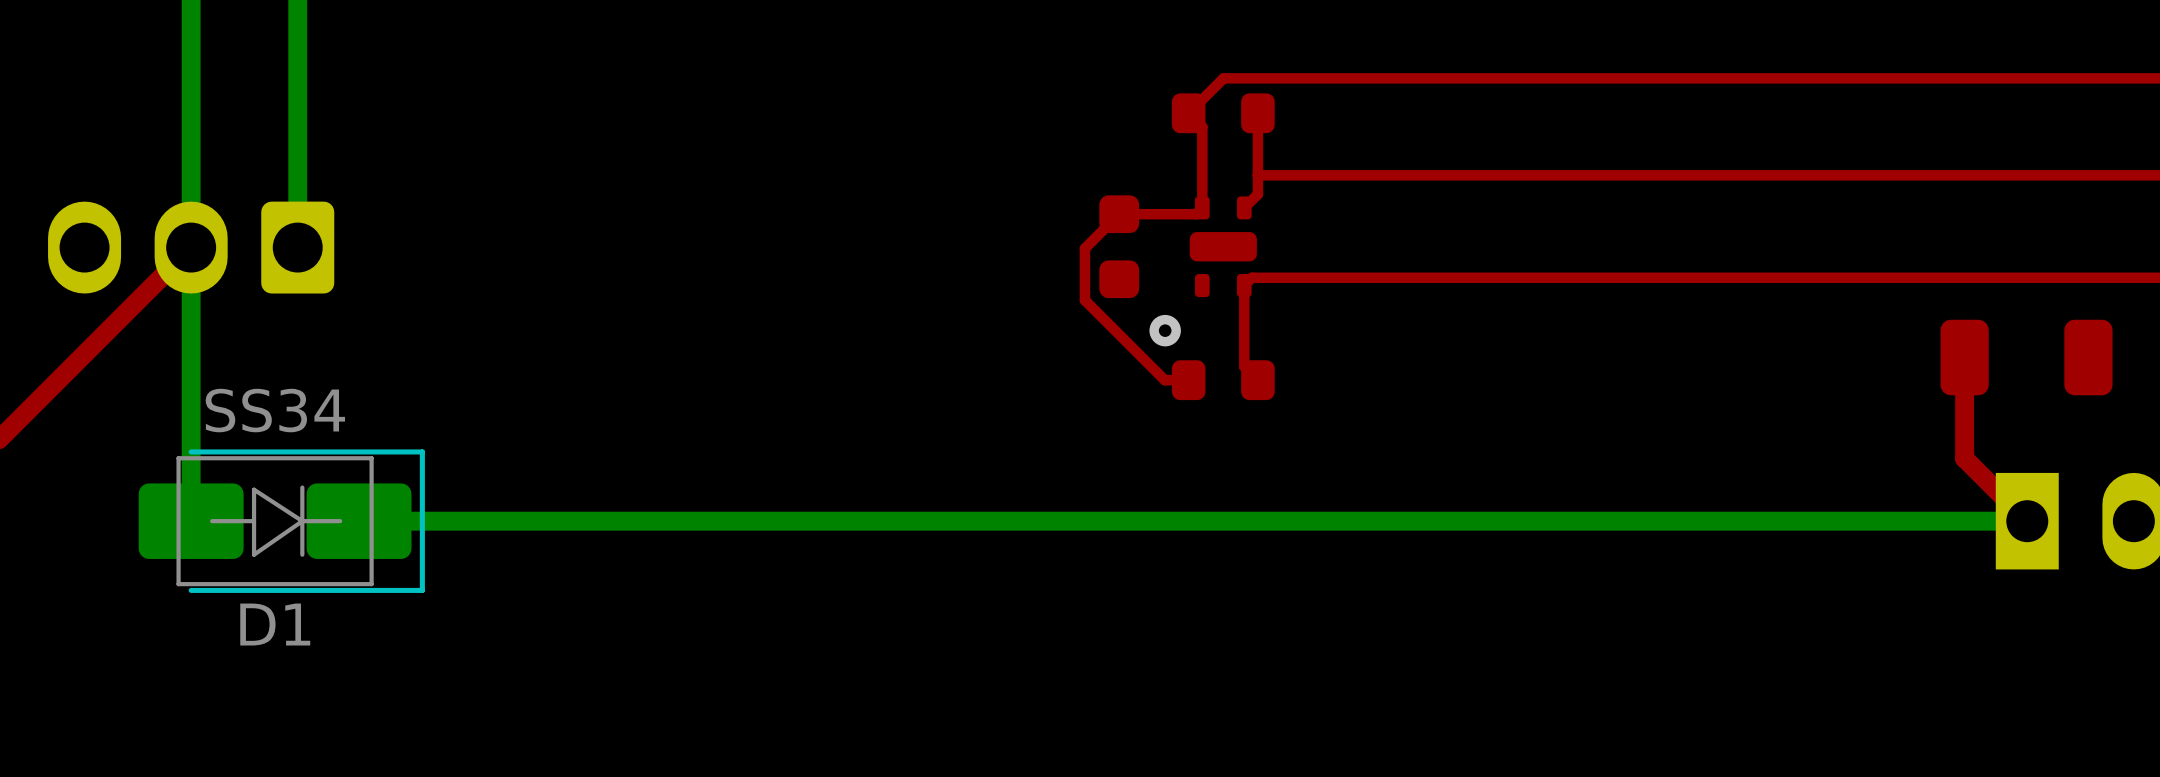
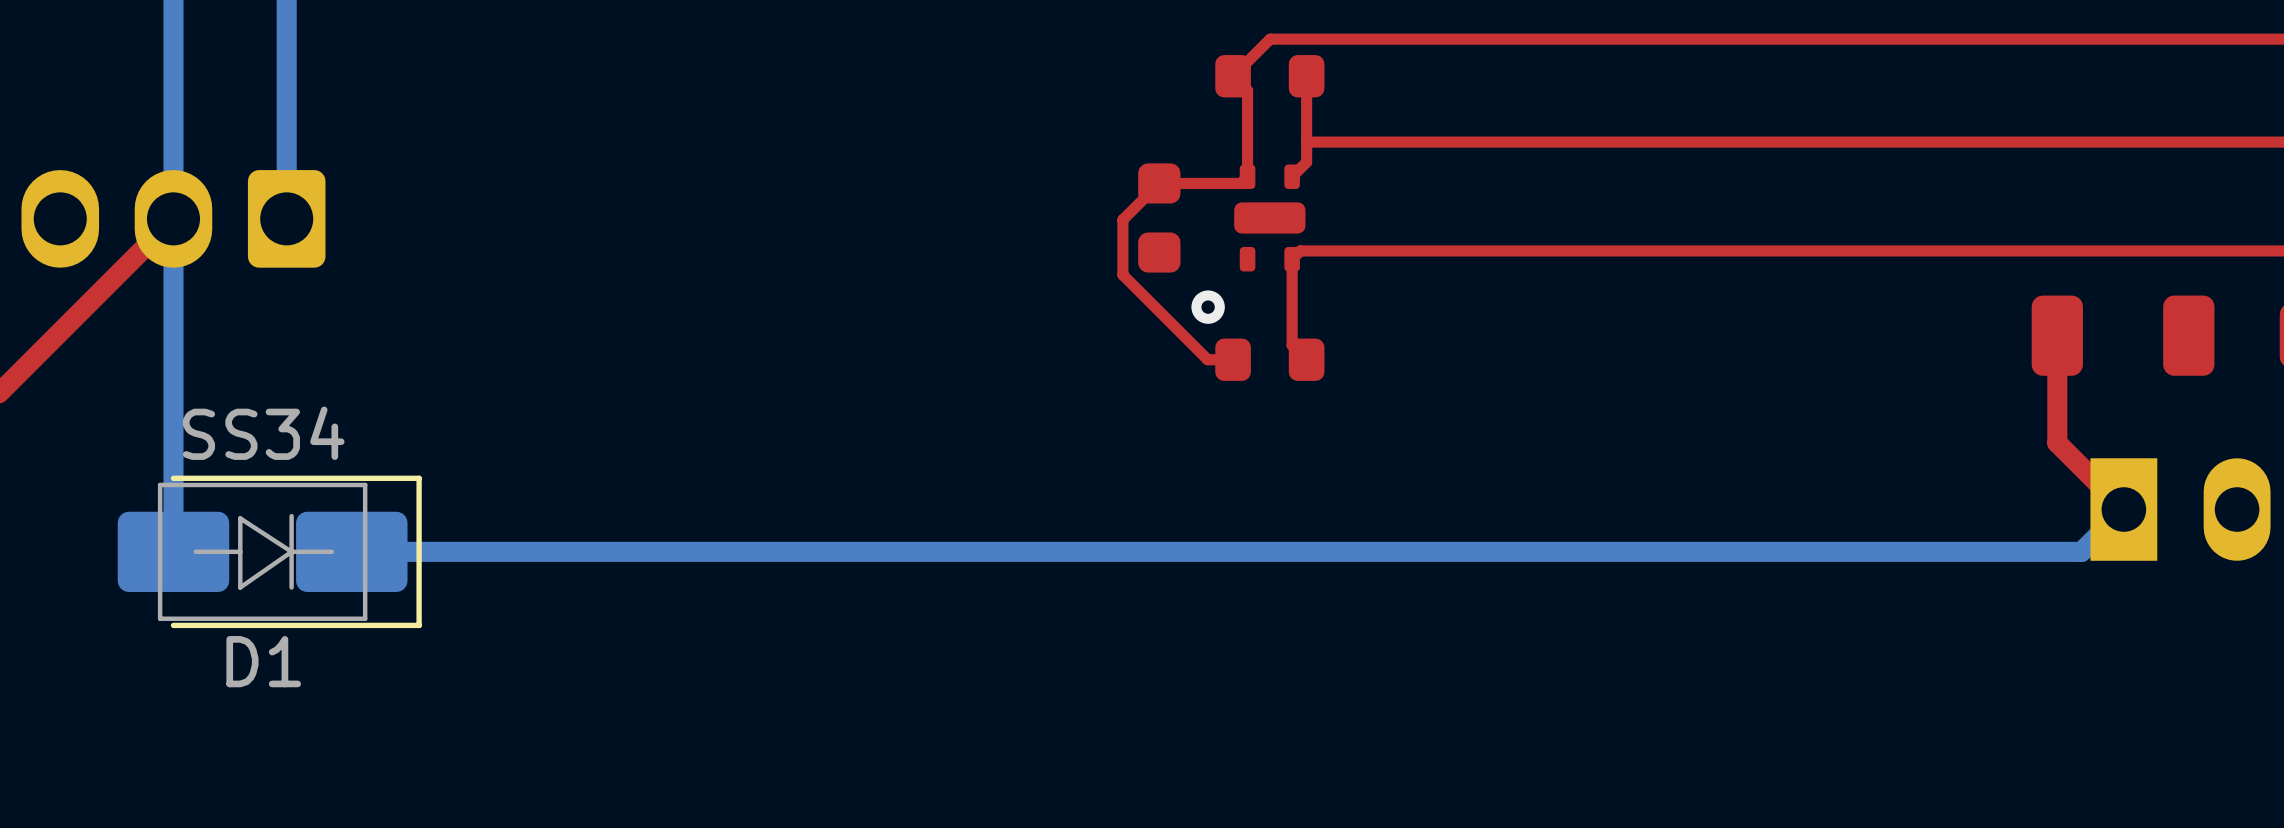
D1 position: (281, 521) -> (269, 551)
bottom track: (2027, 521) (359, 521) -> (2123, 509) (2081, 551) (351, 551)

